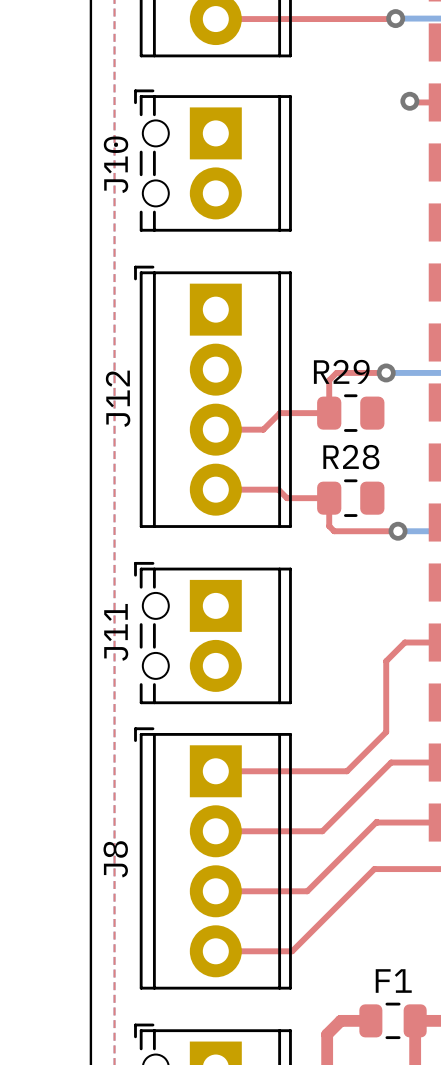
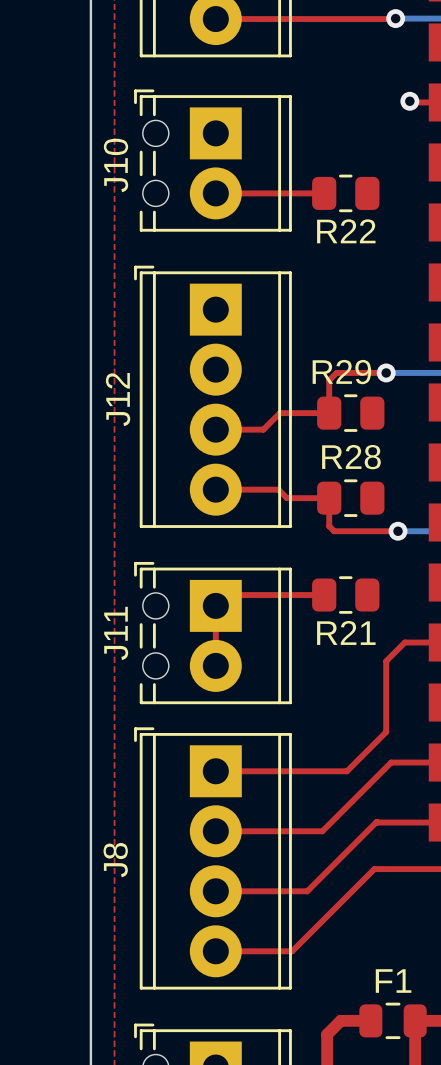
top track: none -> (215, 193) (324, 193)
R22: none -> (345, 193)
top track: none -> (324, 595) (226, 595) (215, 605) (215, 665)
R21: none -> (345, 595)

